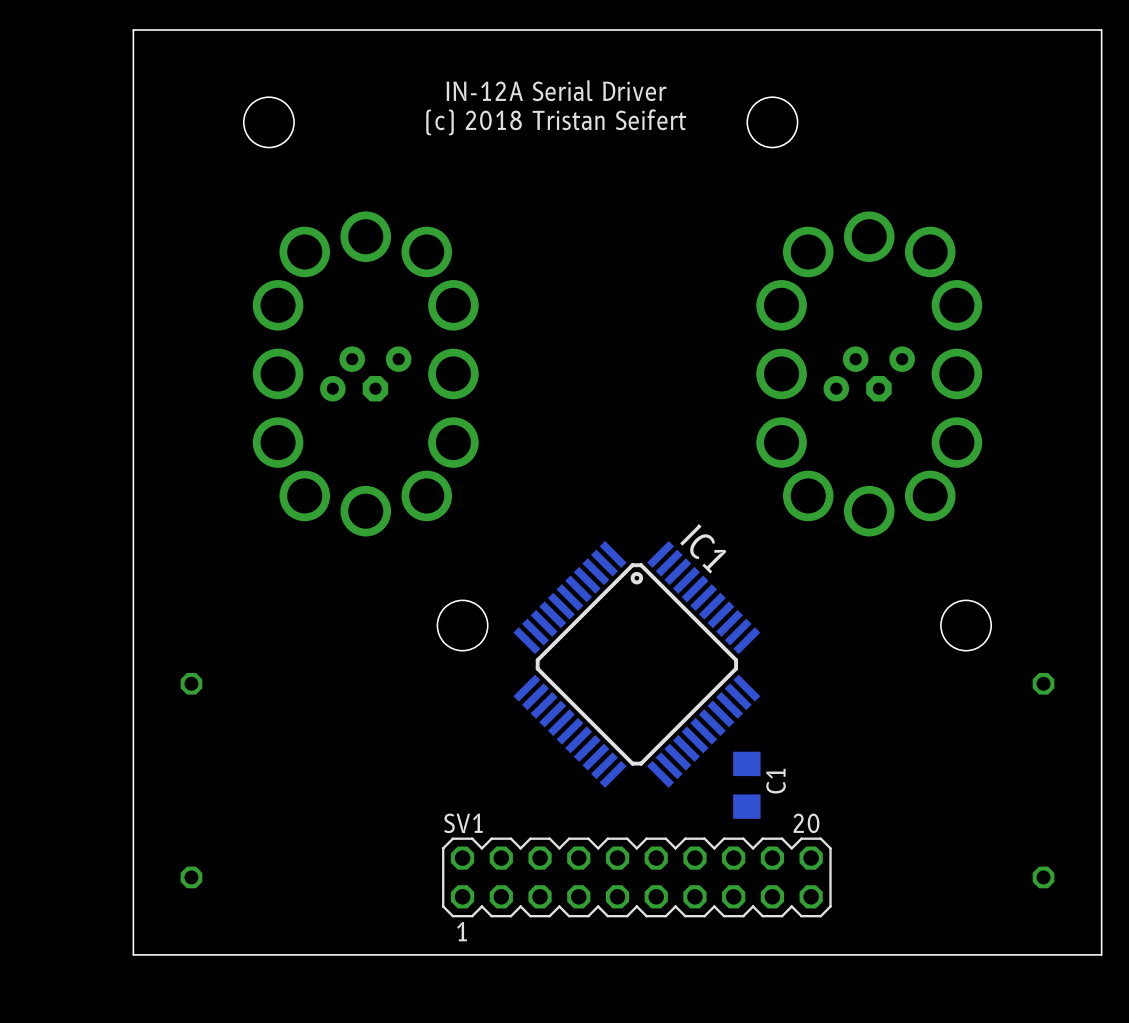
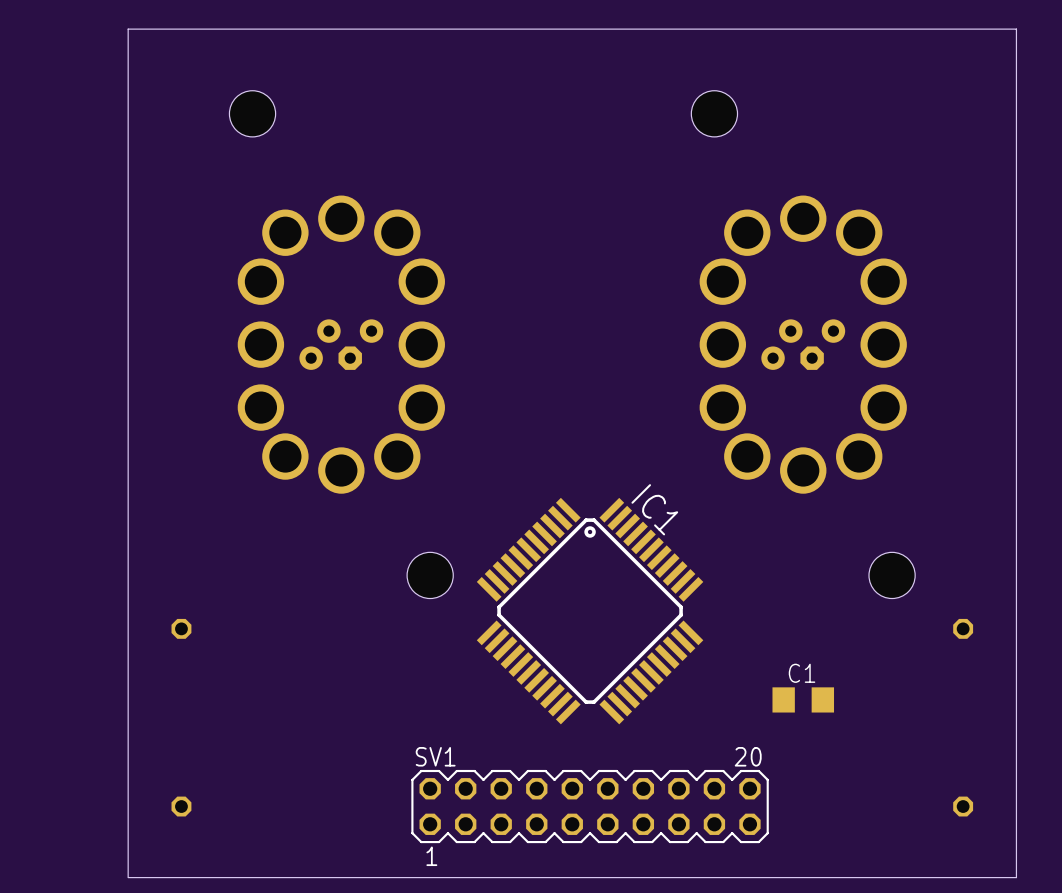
text: IN-12A Serial Driver (556, 90) -> none
text: (c) 2018 Tristan Seifert (556, 122) -> none
C1 name position: C1 (776, 781) -> C1 (802, 673)
C1 rotation: 0° (746, 785) -> 90° clockwise (803, 699)
C1 position: (746, 785) -> (803, 699)

